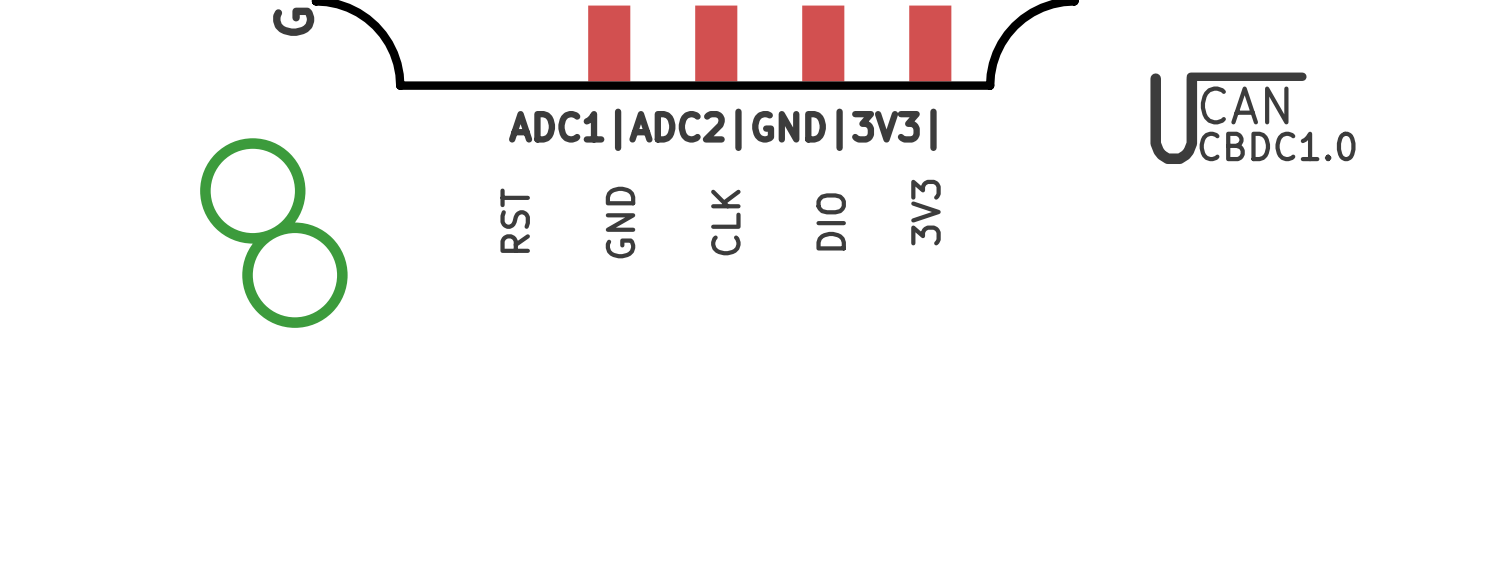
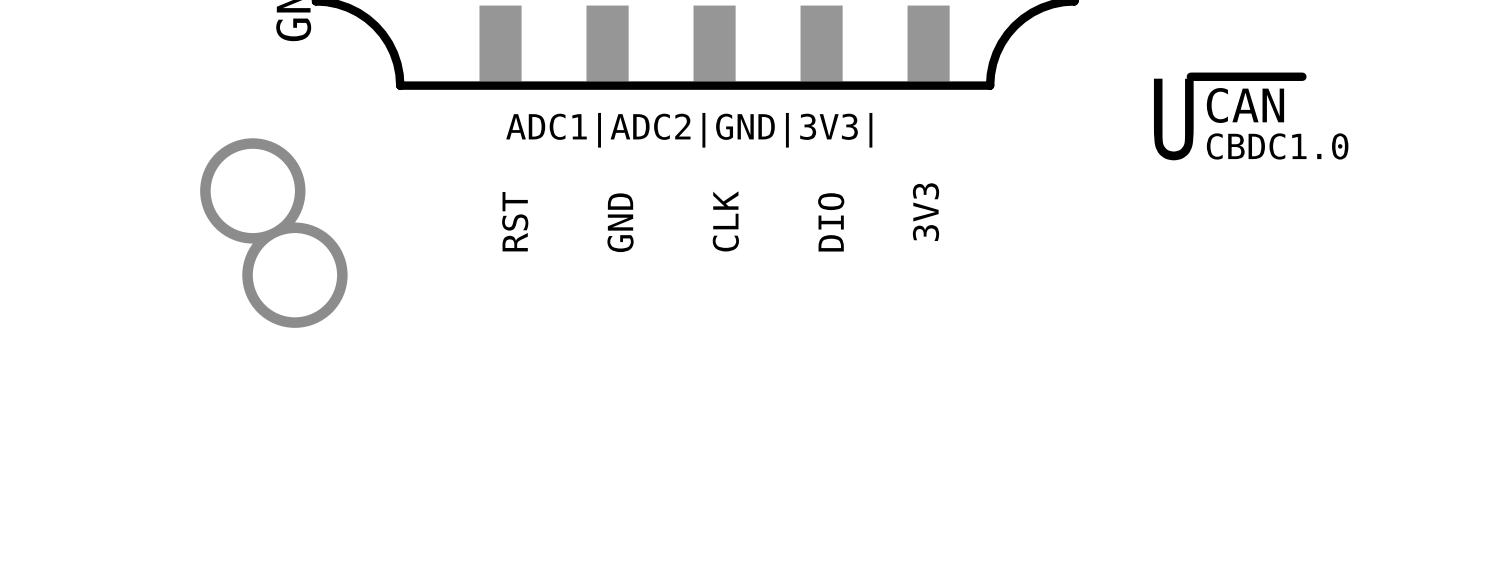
part: none -> (714, 43)
part: (769, 43) -> none

